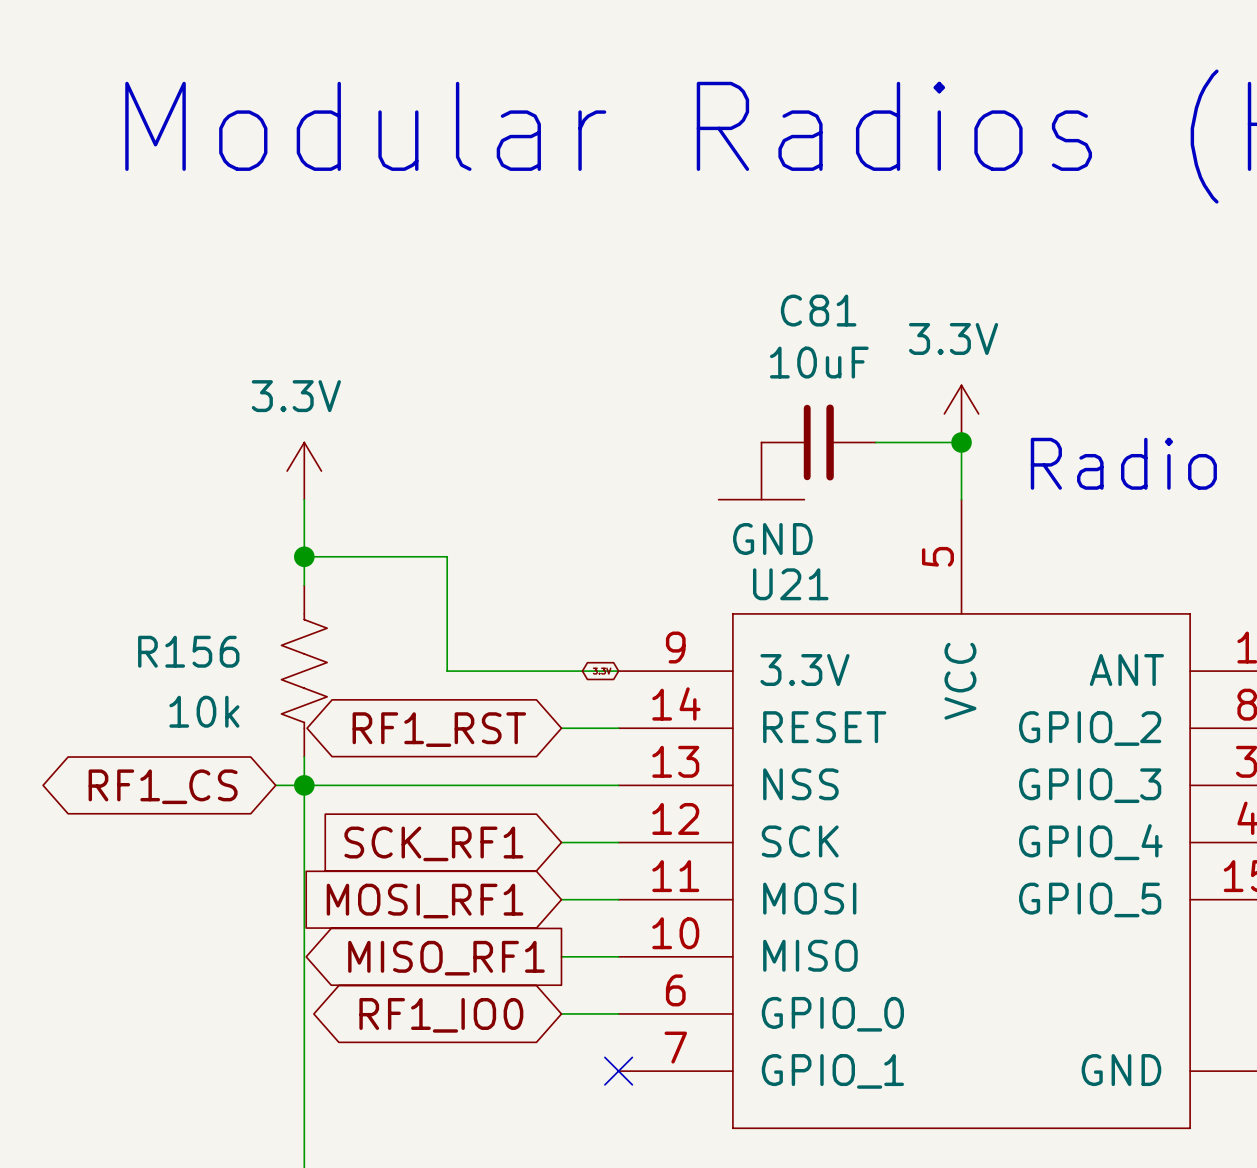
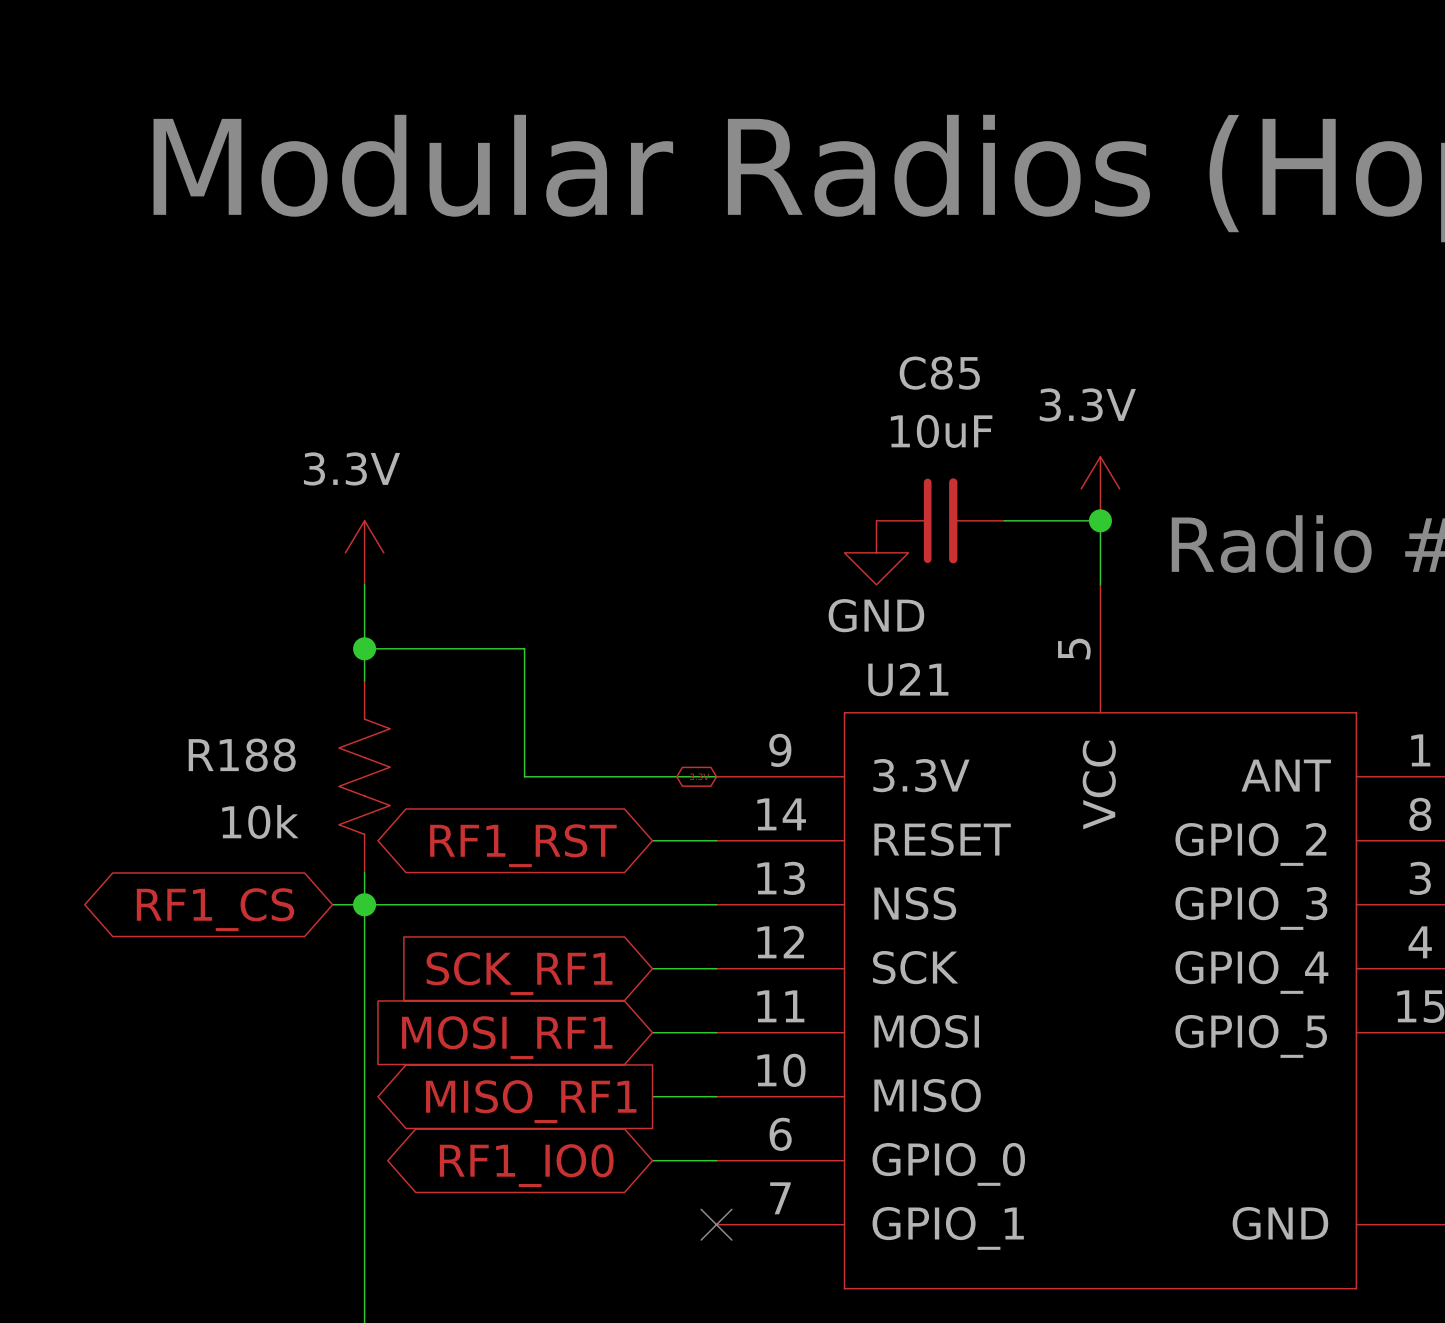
C81 name: C81 (818, 310) -> C85 (939, 373)
power symbol shape: [718, 442, 805, 500] -> [844, 520, 909, 585]
R156 name: R156 (188, 651) -> R188 (242, 755)

